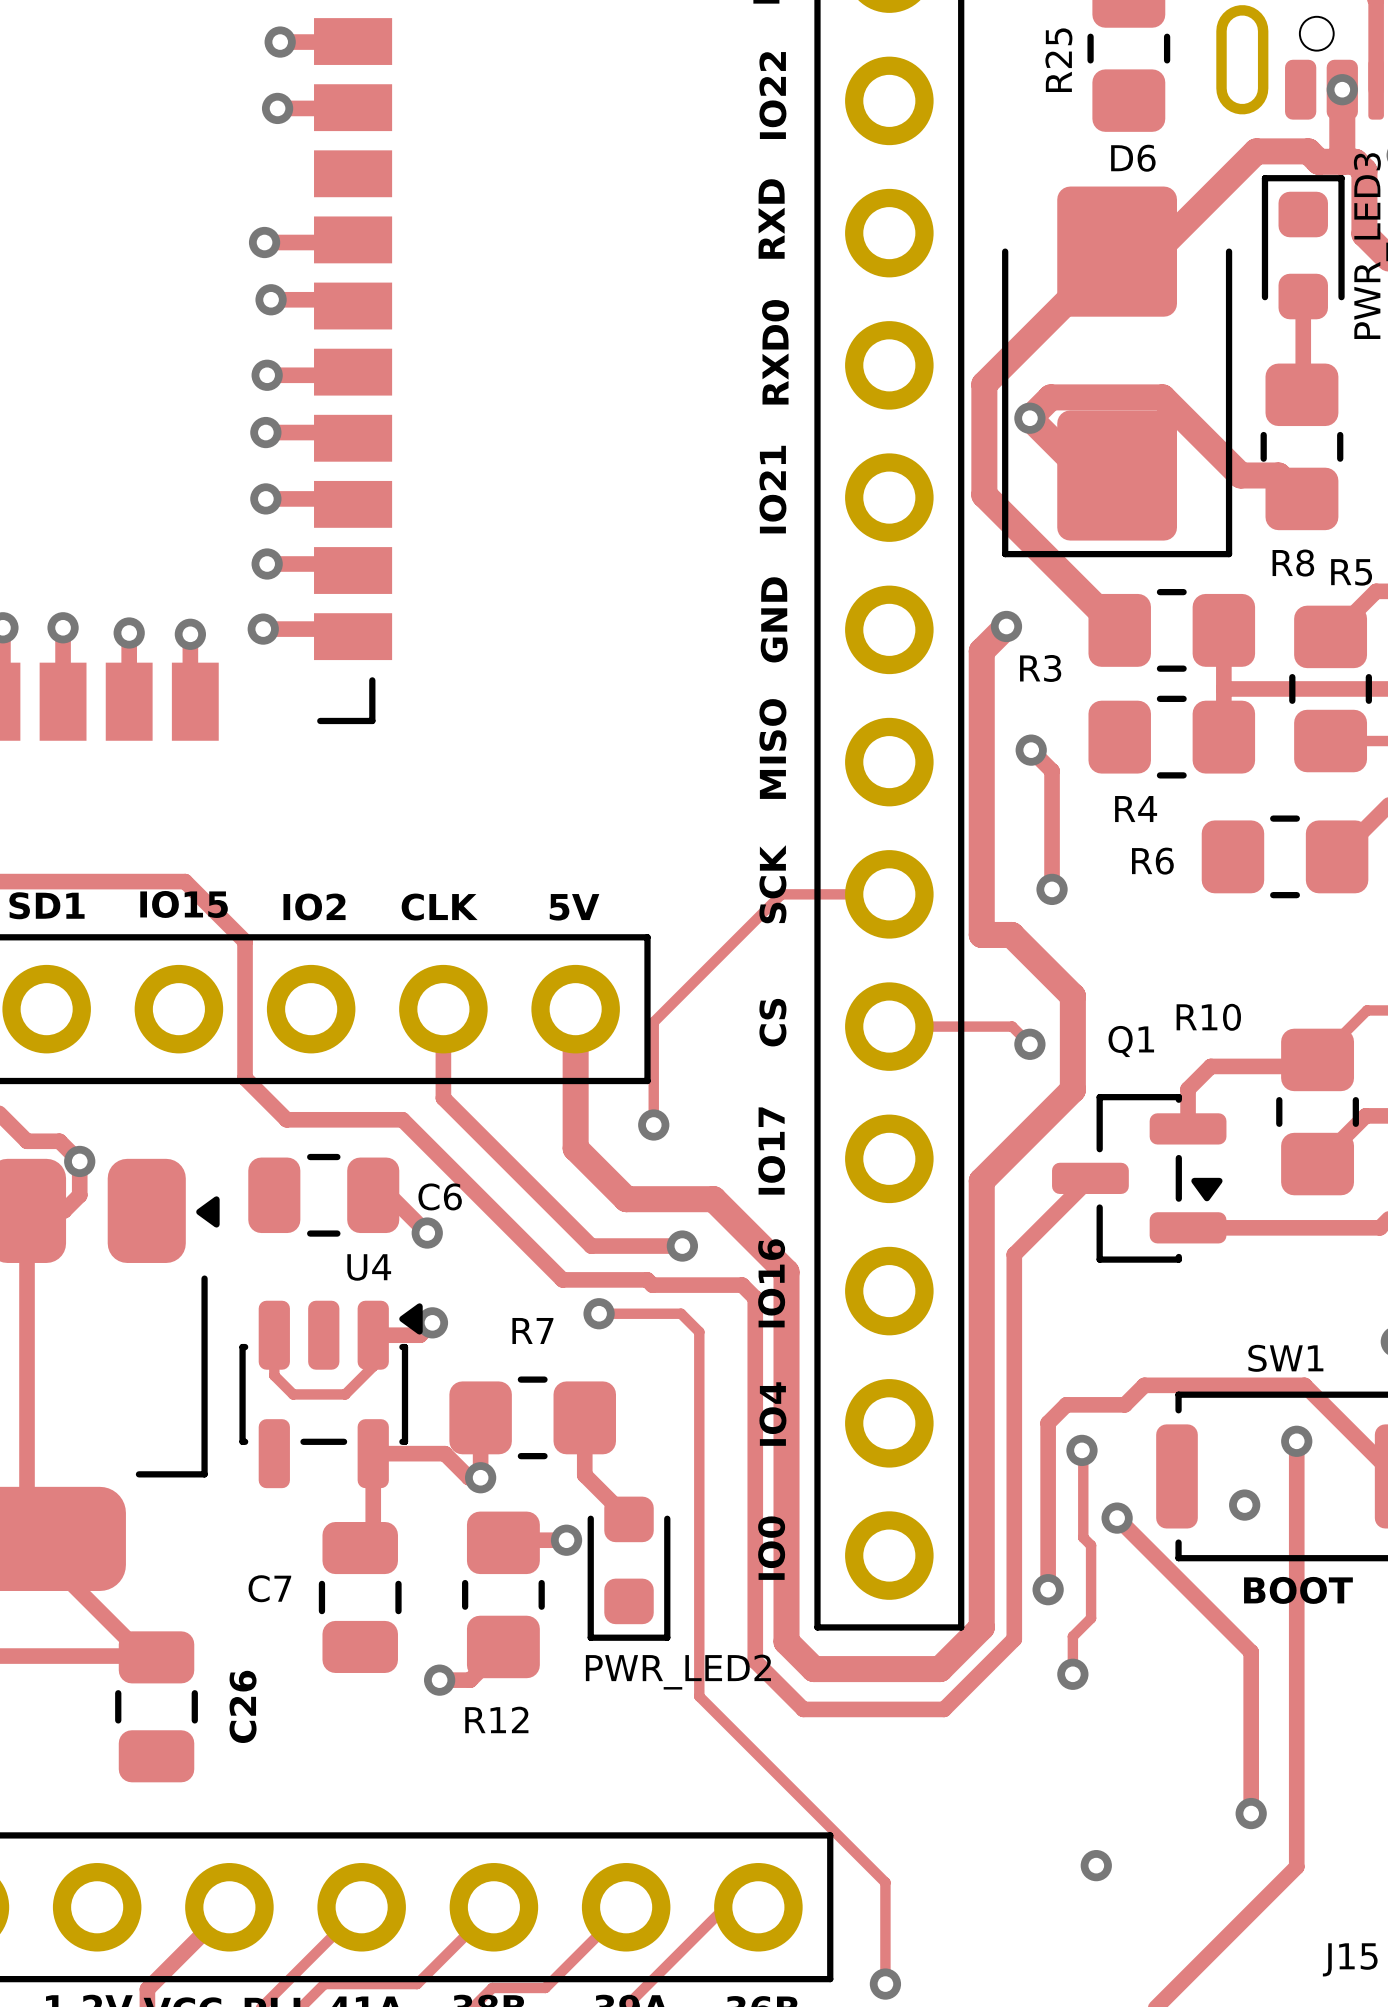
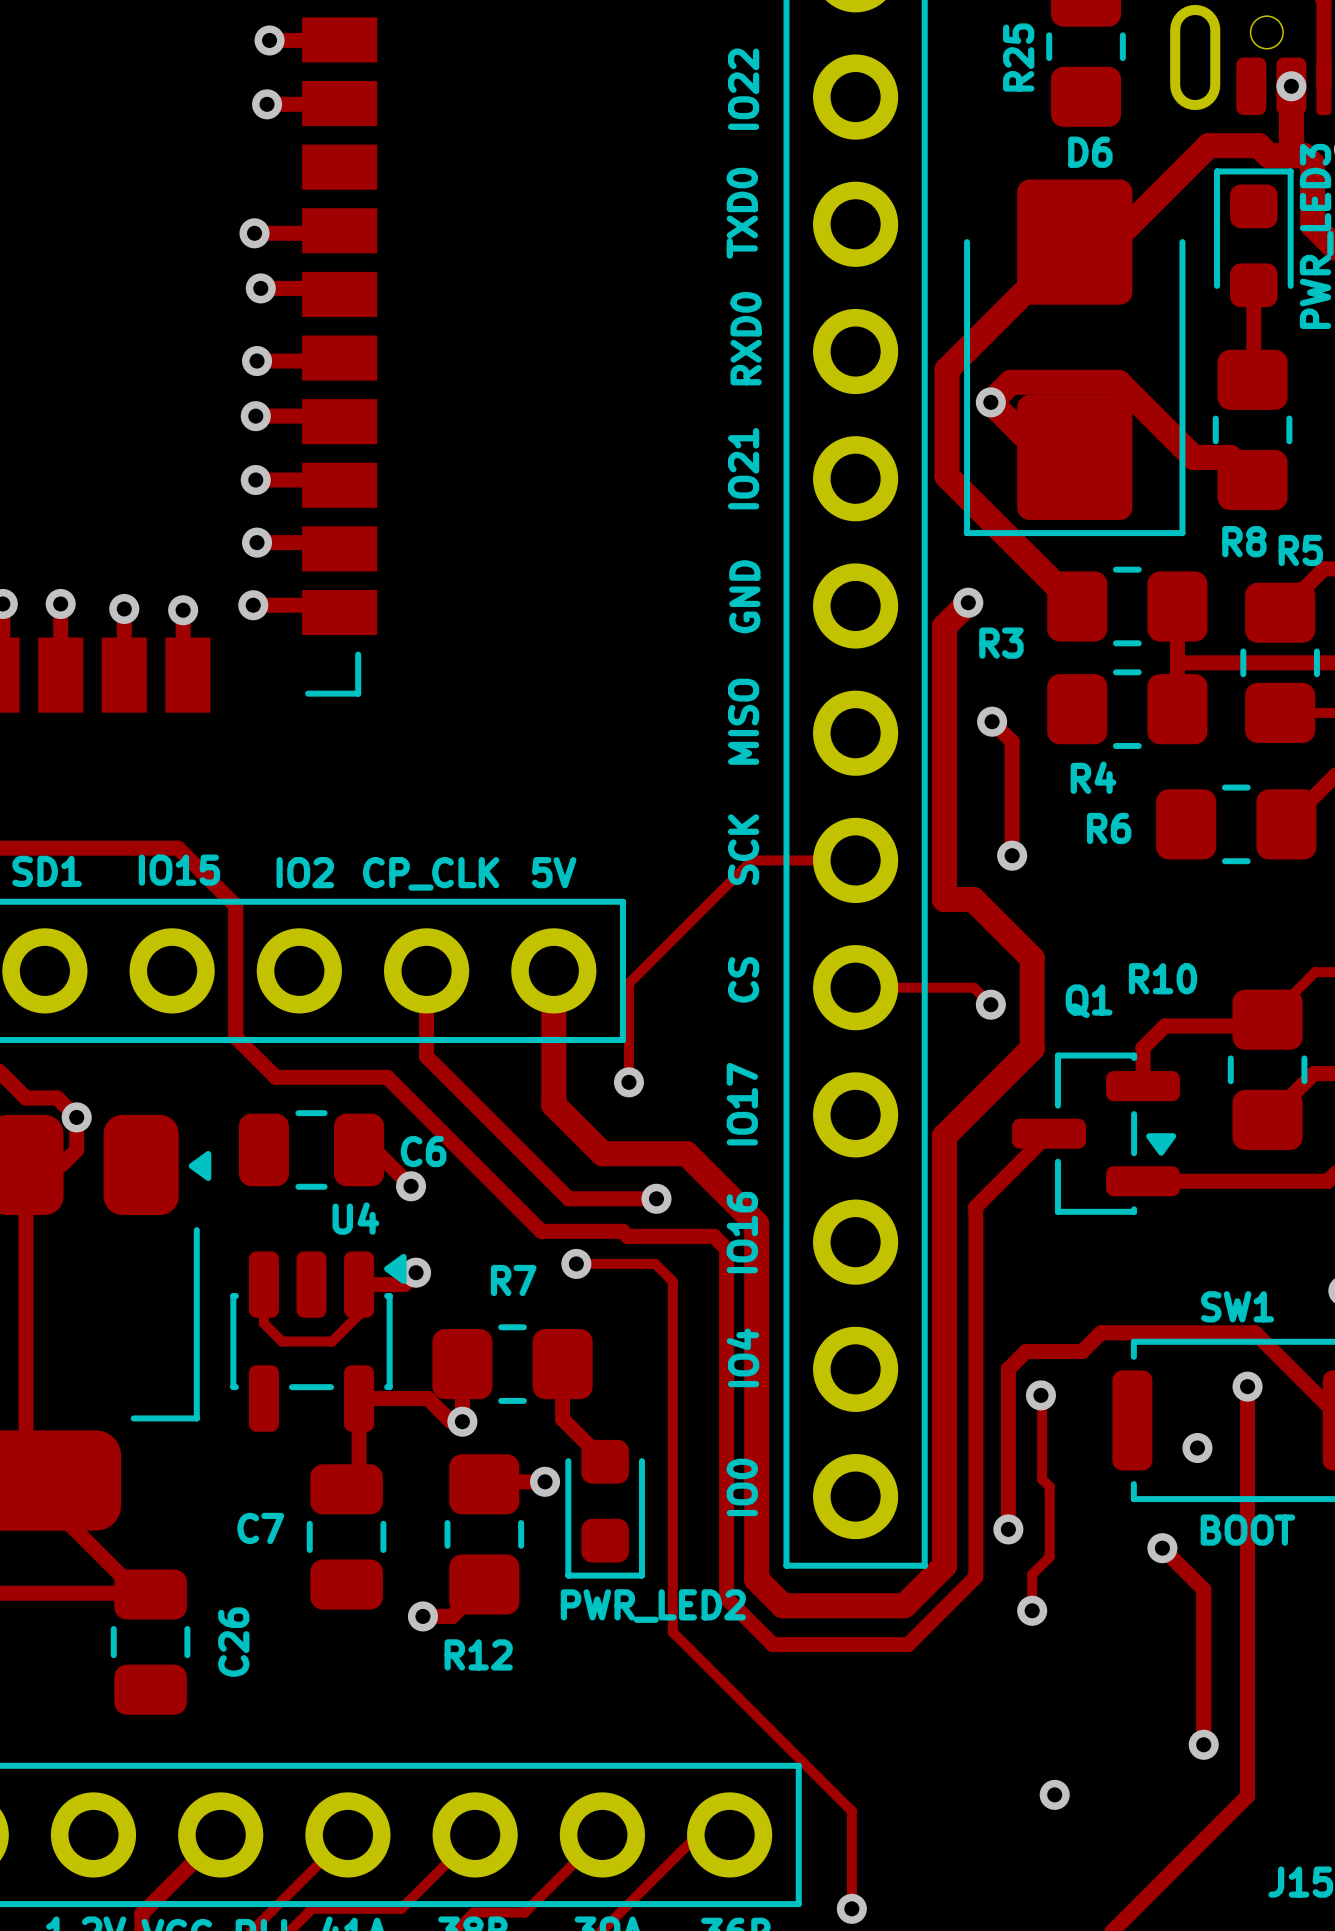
text: RXD (771, 218) -> TXD0 (742, 213)
text: CLK (439, 907) -> CP_CLK (431, 873)
track: (1117, 1518) (1208, 1609) -> none
via position: (1117, 1518) -> (1162, 1548)

